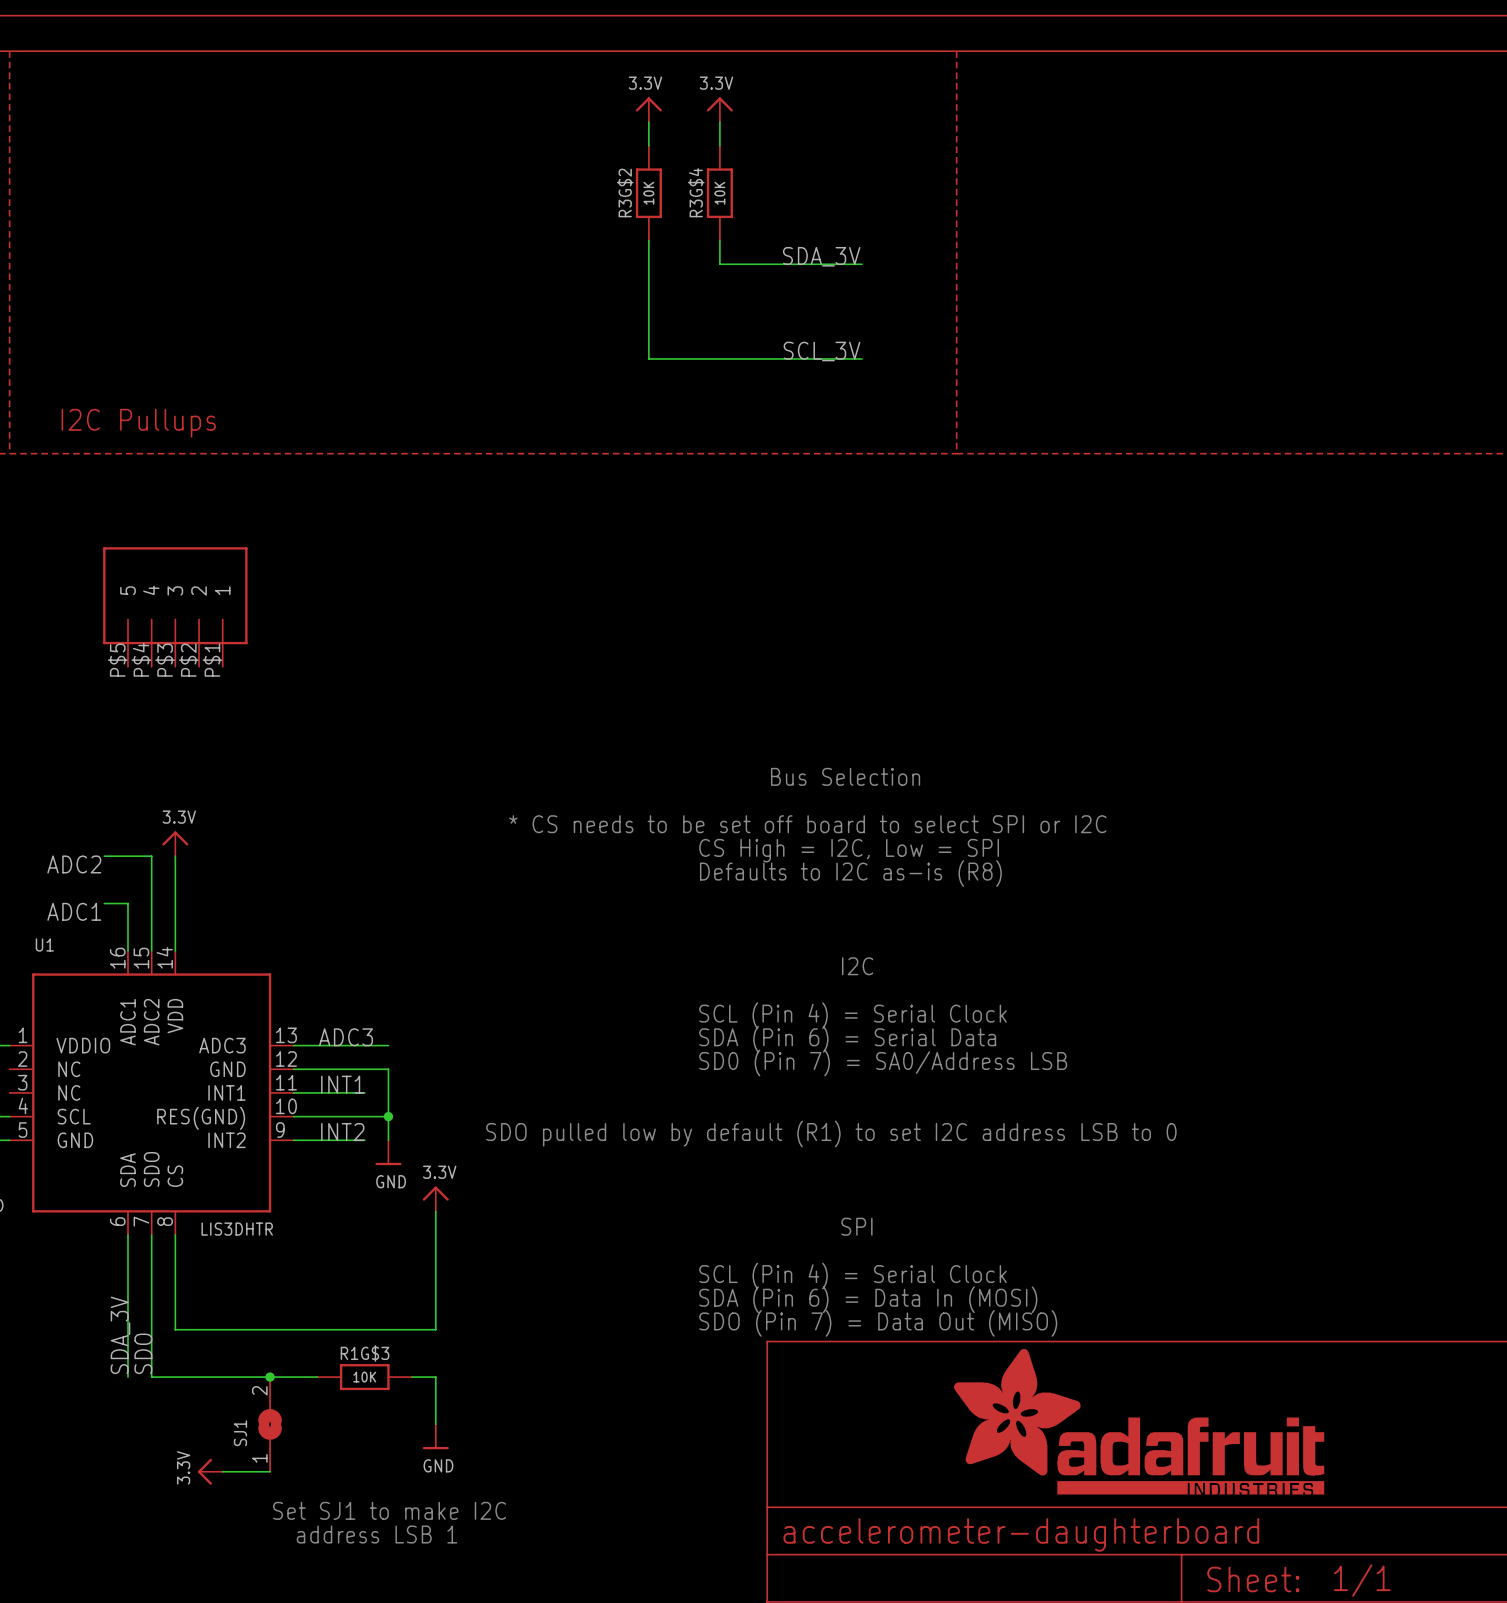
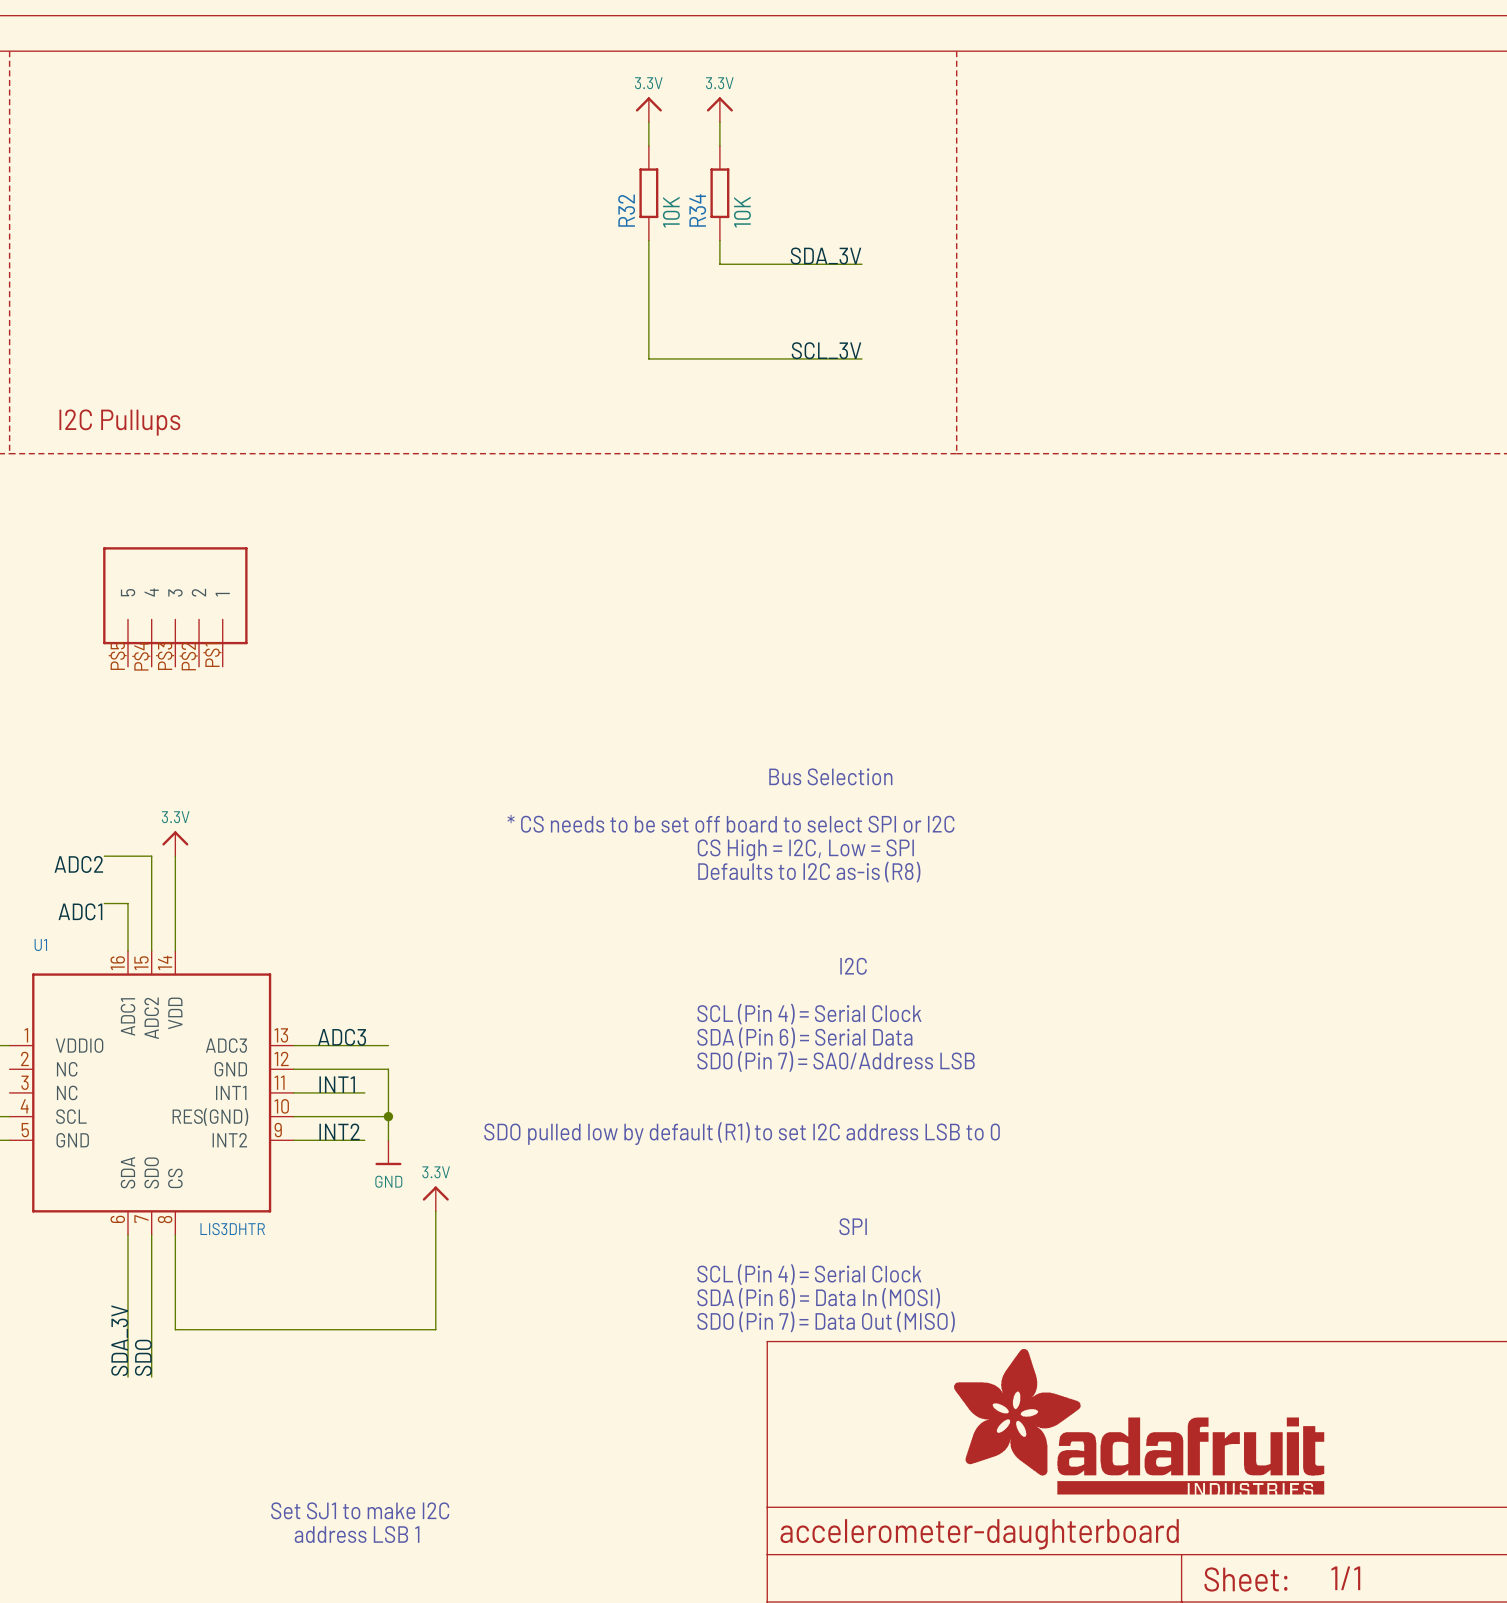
R3G$2: 10K (648, 193) -> none
R32: none -> 10K (648, 193)
R3G$4: 10K (719, 193) -> none
R34: none -> 10K (719, 193)
wire: (151, 1377) (317, 1377) -> none
junction: (270, 1377) -> none
R1G$3: 10K (364, 1377) -> none
wire: (412, 1377) (435, 1377) (435, 1424) -> none
SJ1: (270, 1424) -> none
power symbol: GND (435, 1436) -> none
power symbol: 3.3V (210, 1471) -> none
wire: (222, 1471) (270, 1471) -> none

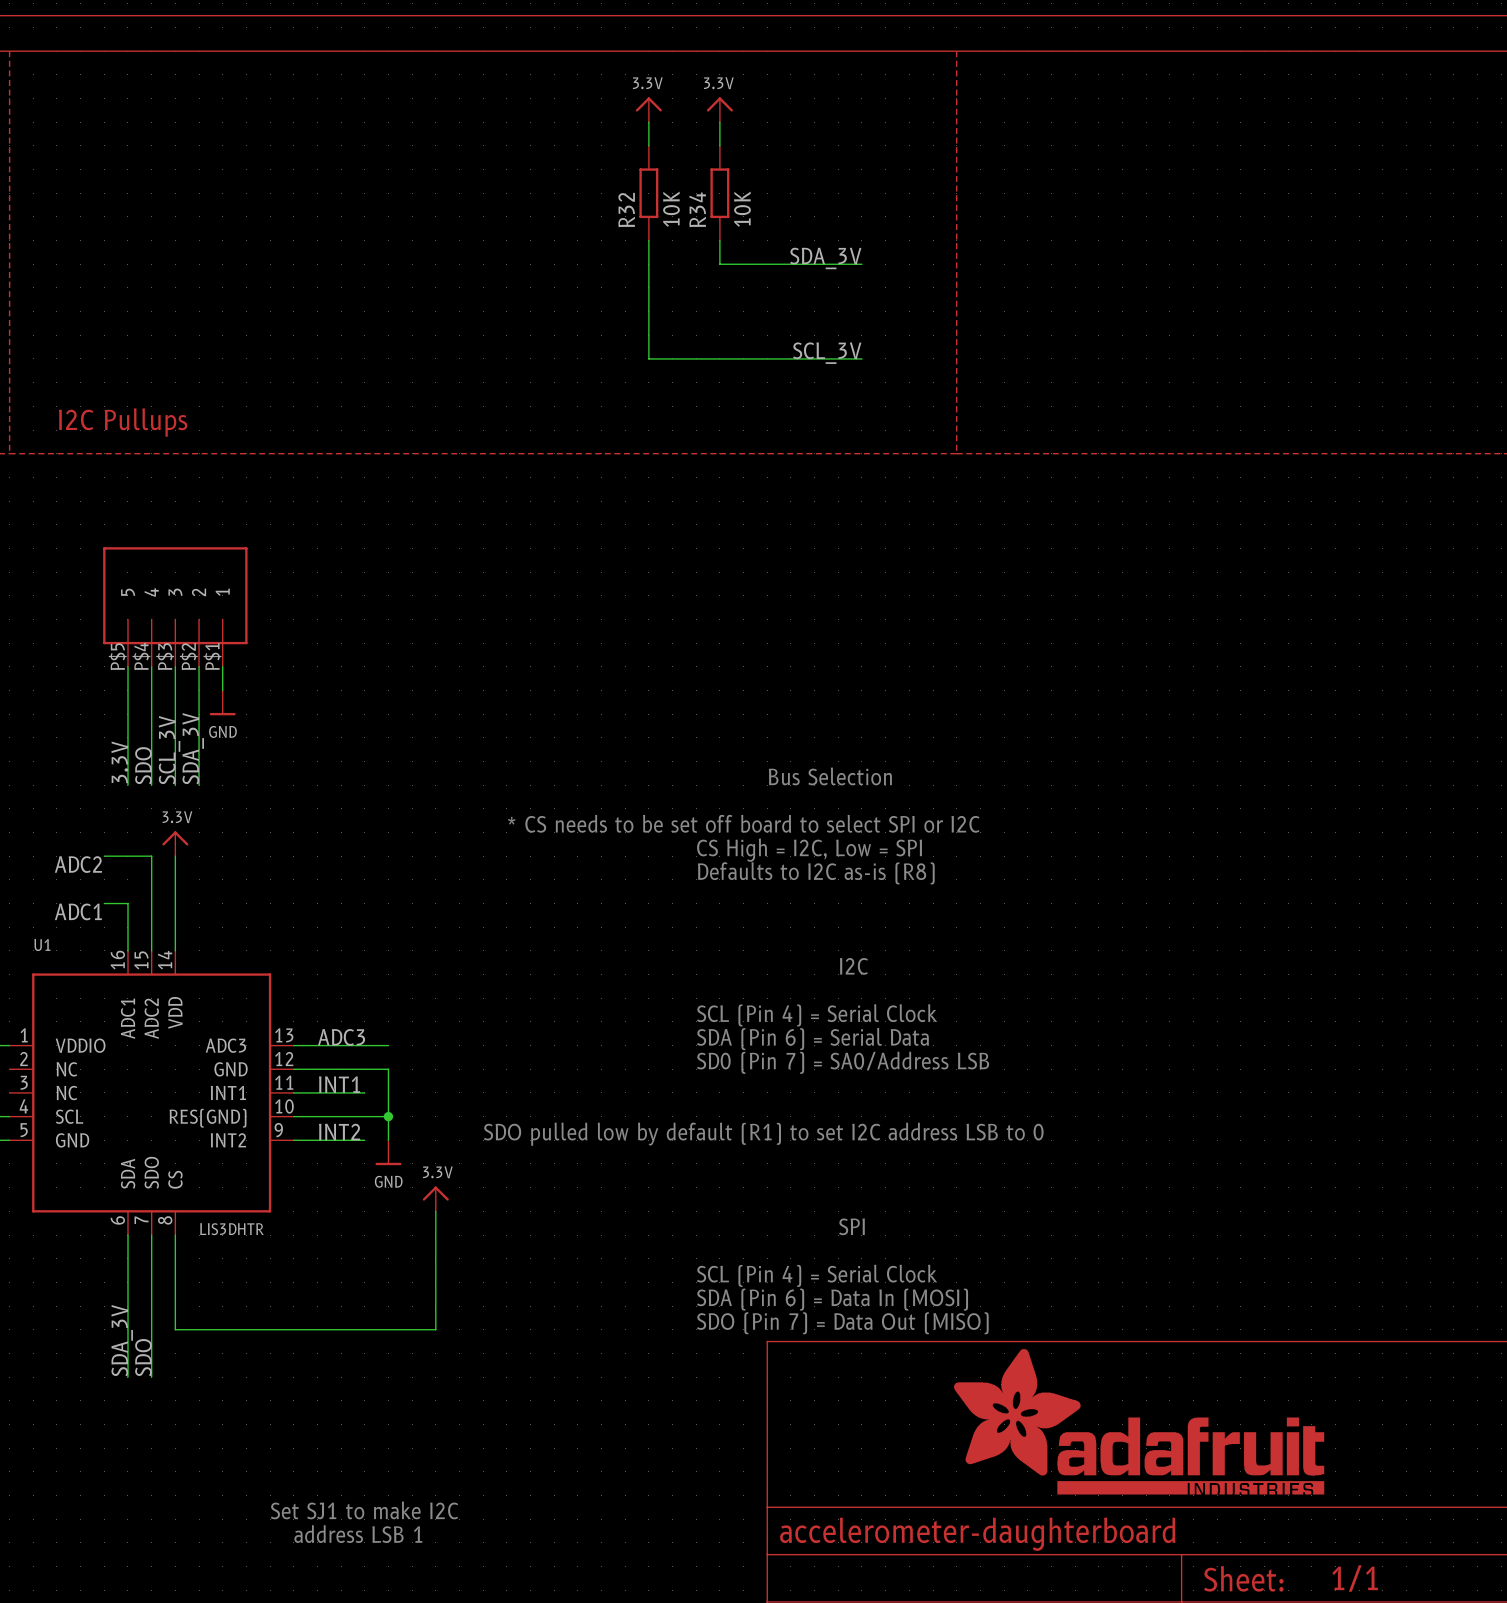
wire: none -> (127, 666) (127, 785)
wire: none -> (151, 666) (151, 785)
wire: none -> (175, 666) (175, 785)
wire: none -> (199, 666) (199, 785)
wire: none -> (222, 666) (222, 690)
power symbol: none -> GND (222, 702)
label: none -> SDA_3V (193, 748)
label: none -> SCL_3V (169, 750)
label: none -> 3.3V (119, 762)
label: none -> SDO (143, 765)

